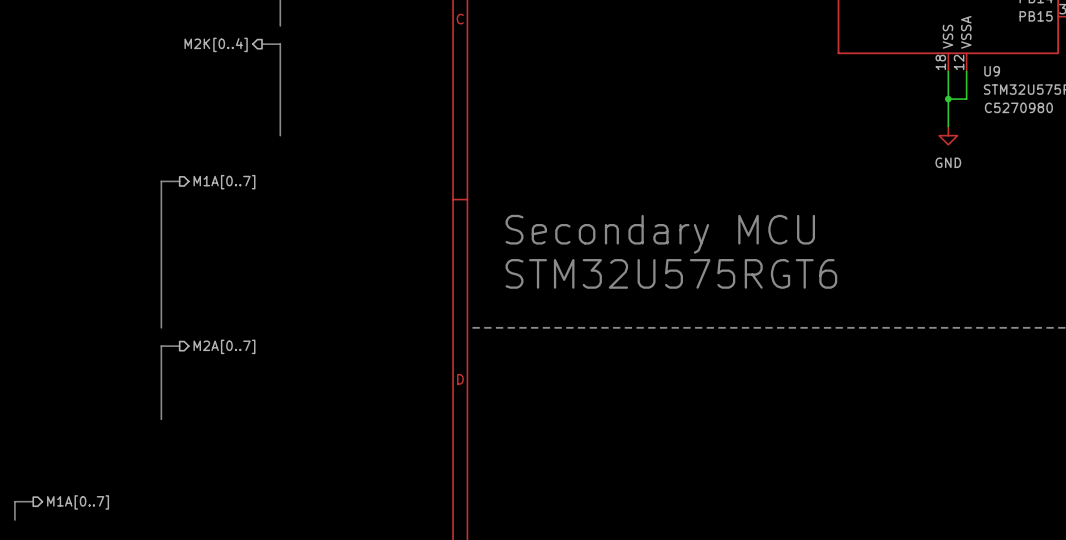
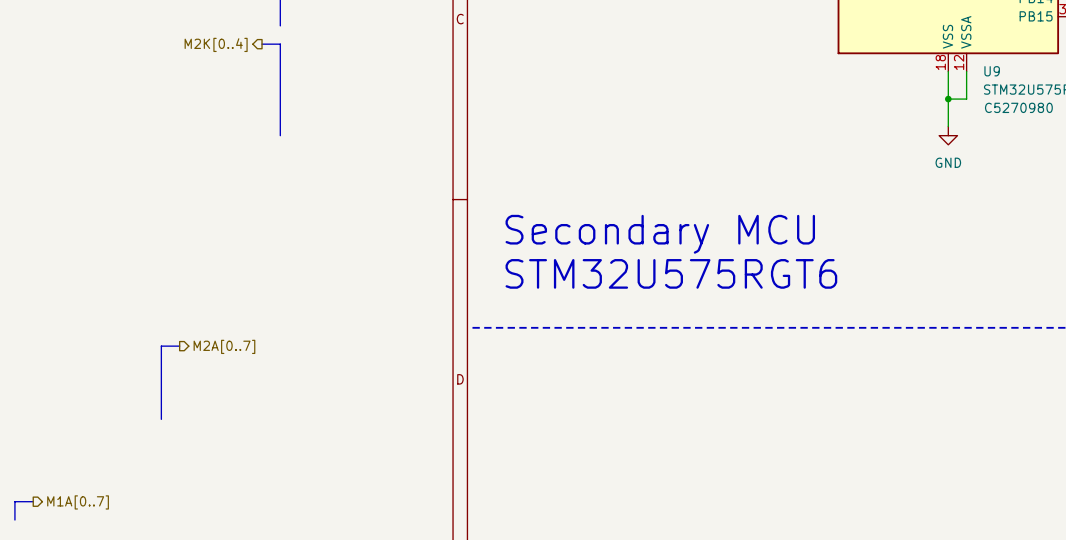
bus: (179, 181) (161, 181) (161, 327) -> none
hierarchical label: M1A[0..7] (224, 182) -> none

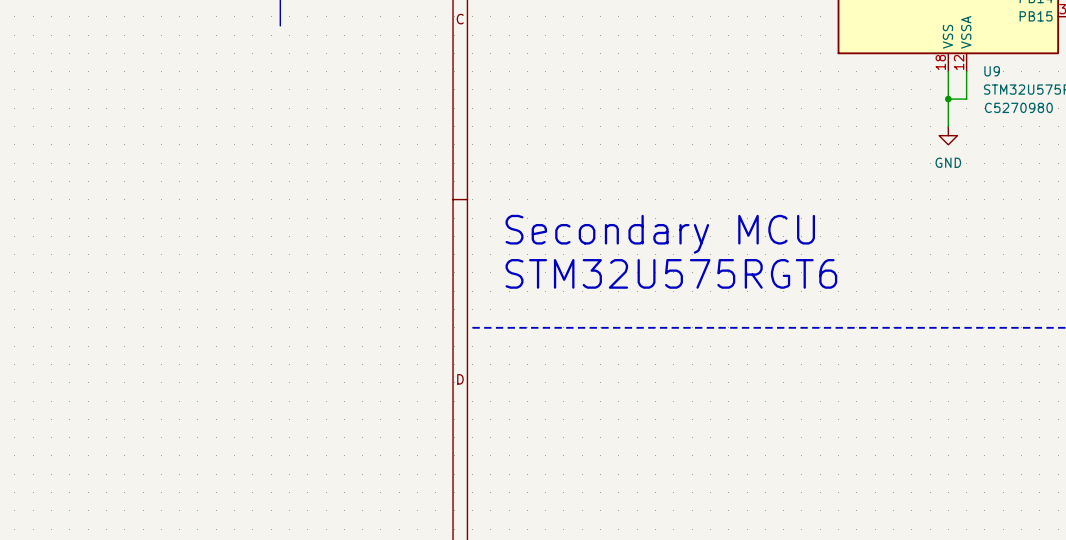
hierarchical label: M2K[0..4] (216, 44) -> none
bus: (262, 44) (280, 44) (280, 135) -> none
bus: (179, 346) (161, 346) (161, 419) -> none
hierarchical label: M2A[0..7] (224, 346) -> none
bus: (33, 501) (14, 501) (14, 520) -> none
hierarchical label: M1A[0..7] (78, 502) -> none

